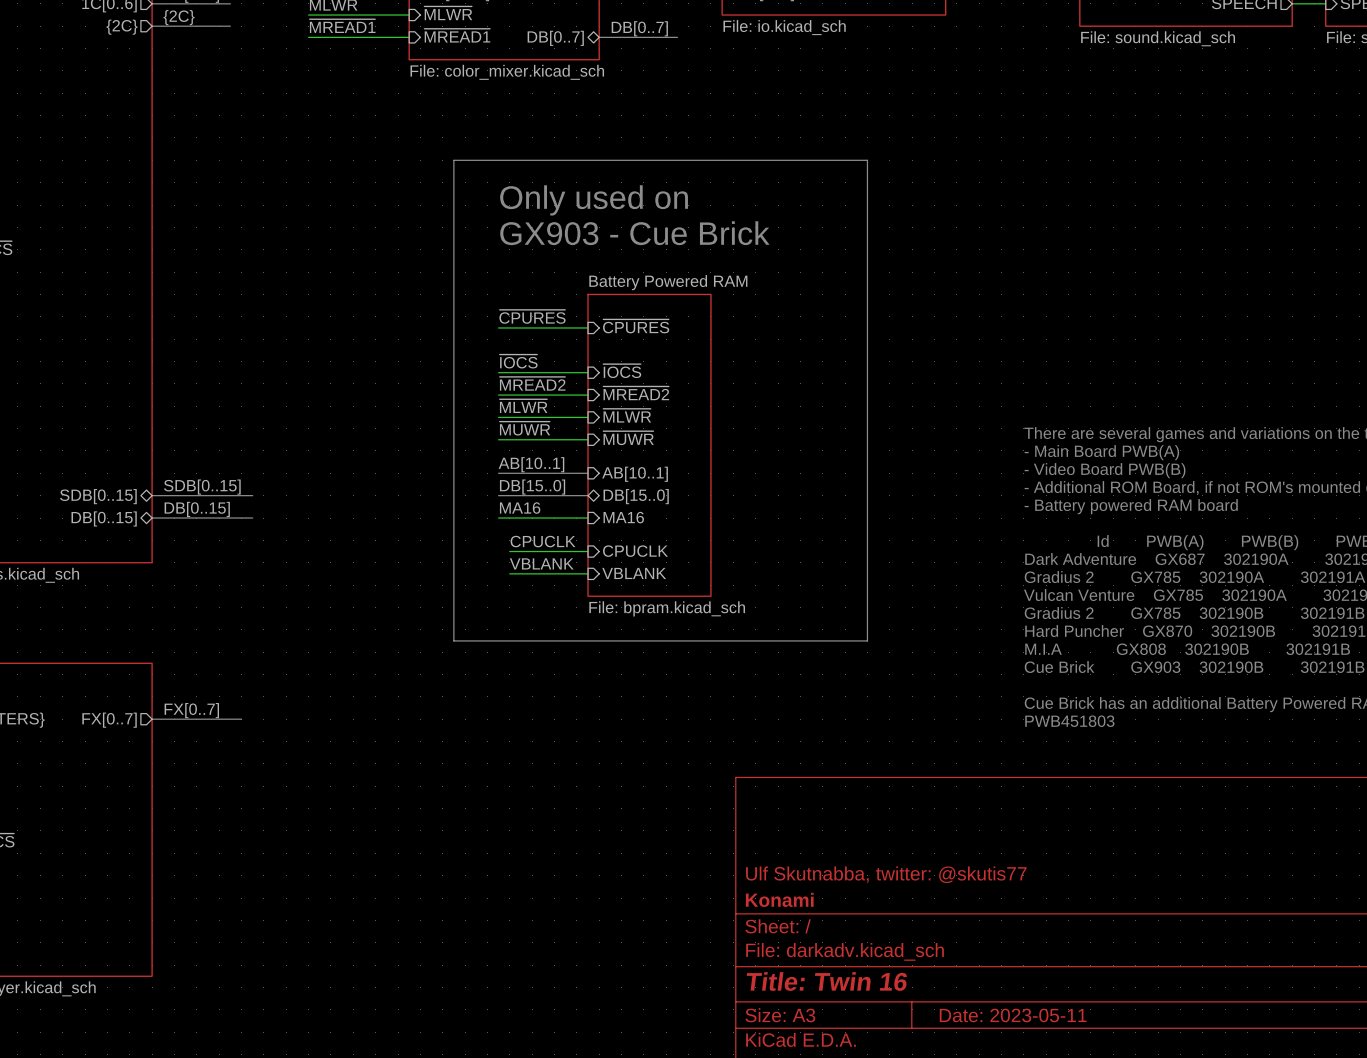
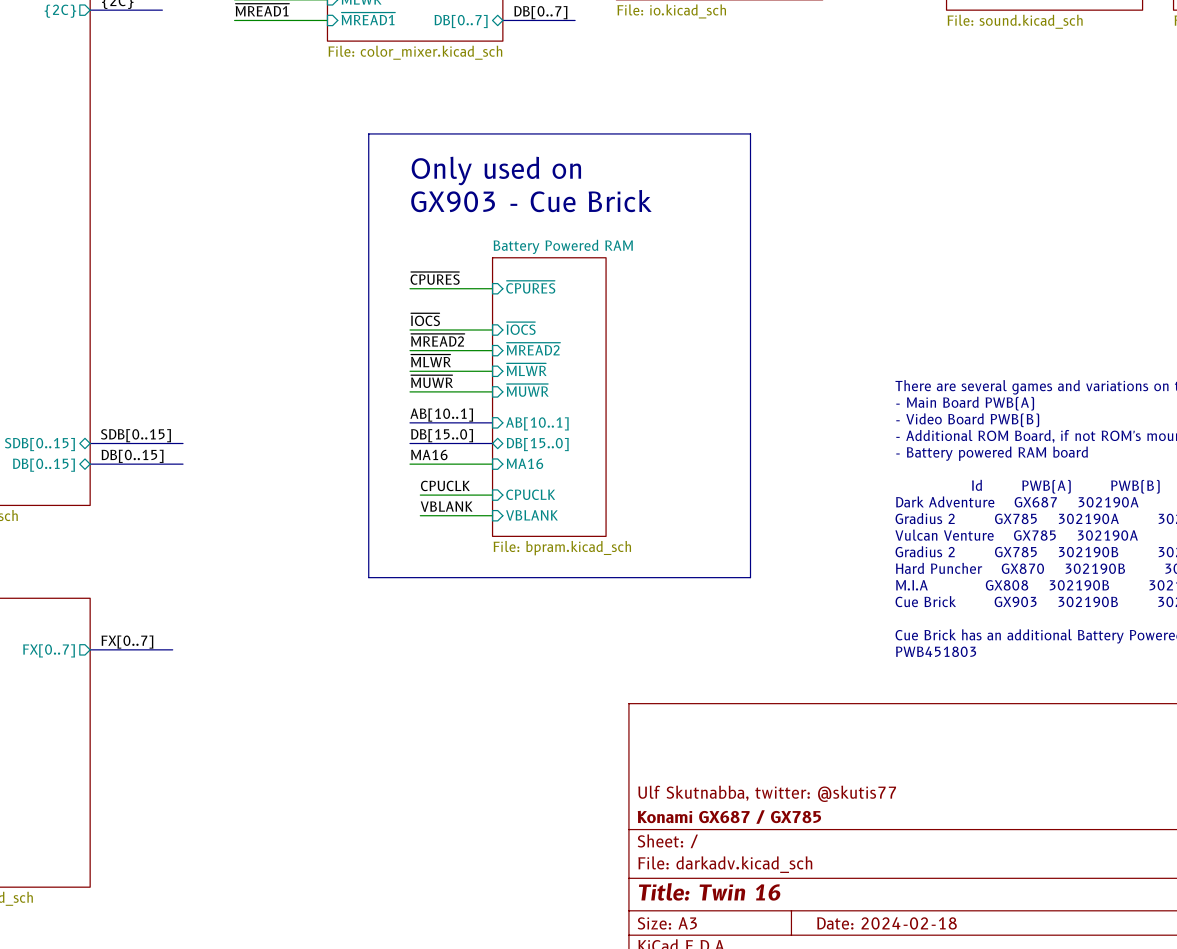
title block: Konami (779, 899) -> Konami GX687 / GX785 (729, 817)
title block: Date: 2023-05-11 (1013, 1015) -> Date: 2024-02-18 (886, 923)

